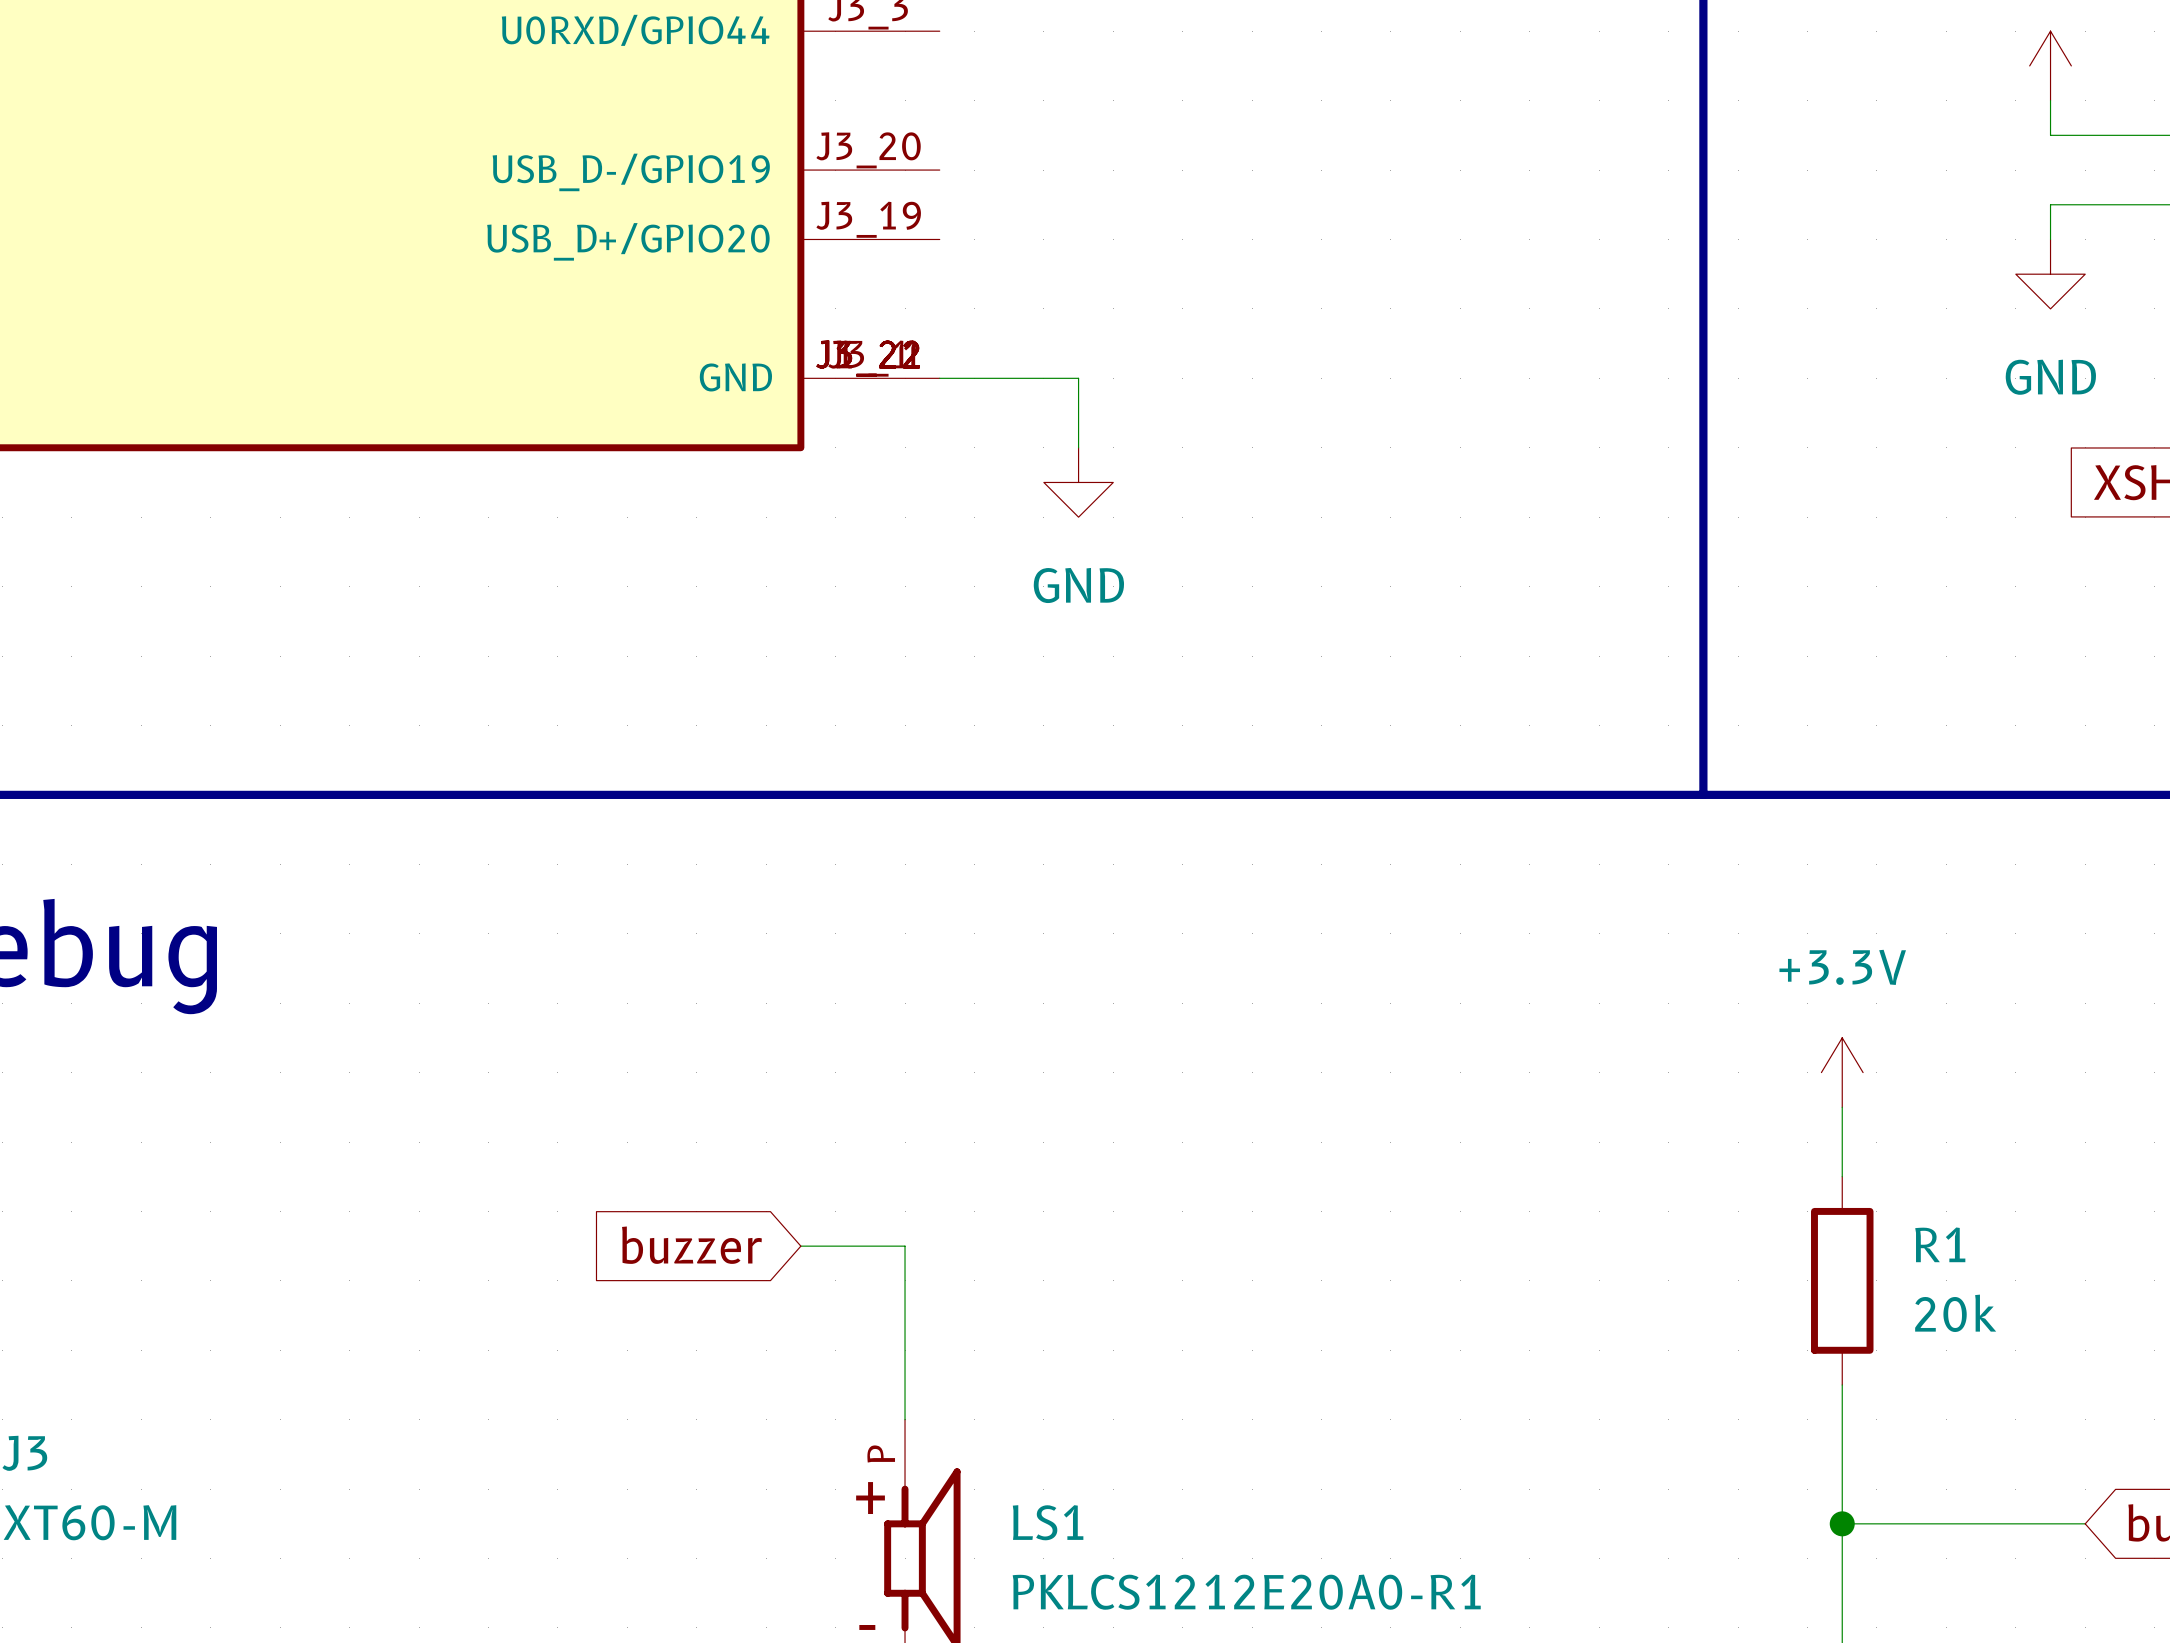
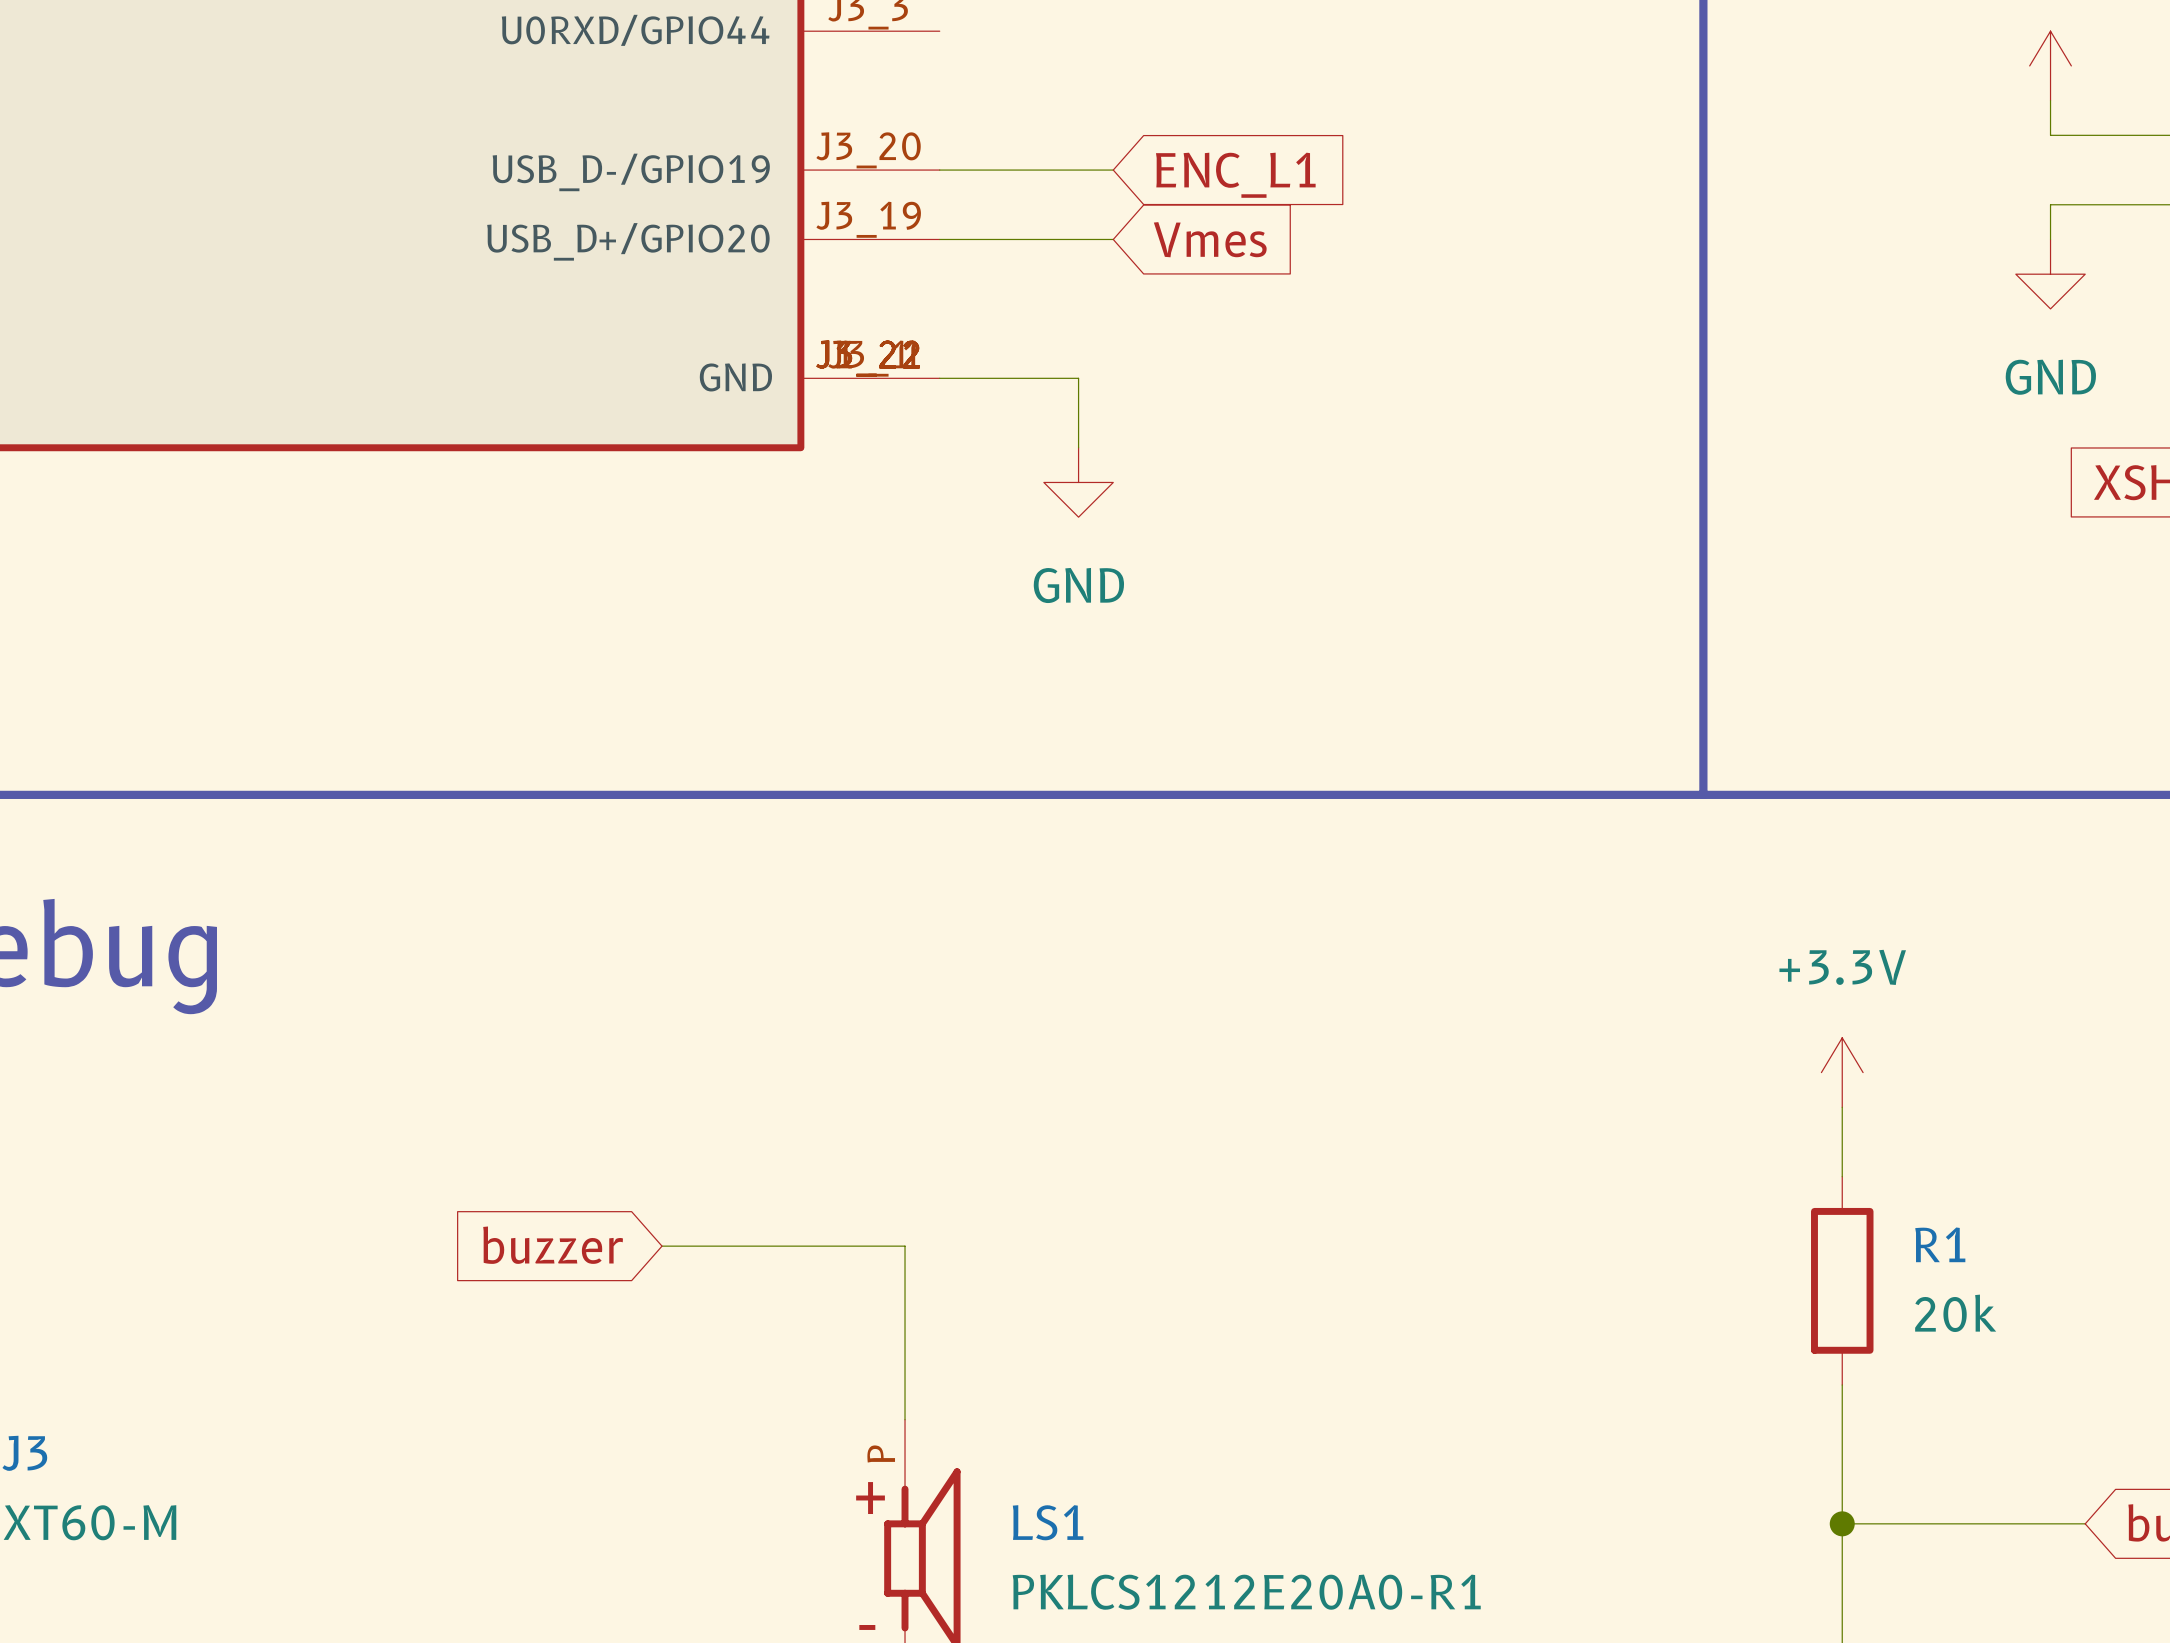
wire: none -> (939, 170) (1113, 170)
global label: none -> ENC_L1 (1235, 175)
wire: none -> (939, 239) (1113, 239)
global label: none -> Vmes (1210, 239)
global label position: buzzer (691, 1245) -> buzzer (553, 1245)
wire: none -> (662, 1246) (800, 1246)

